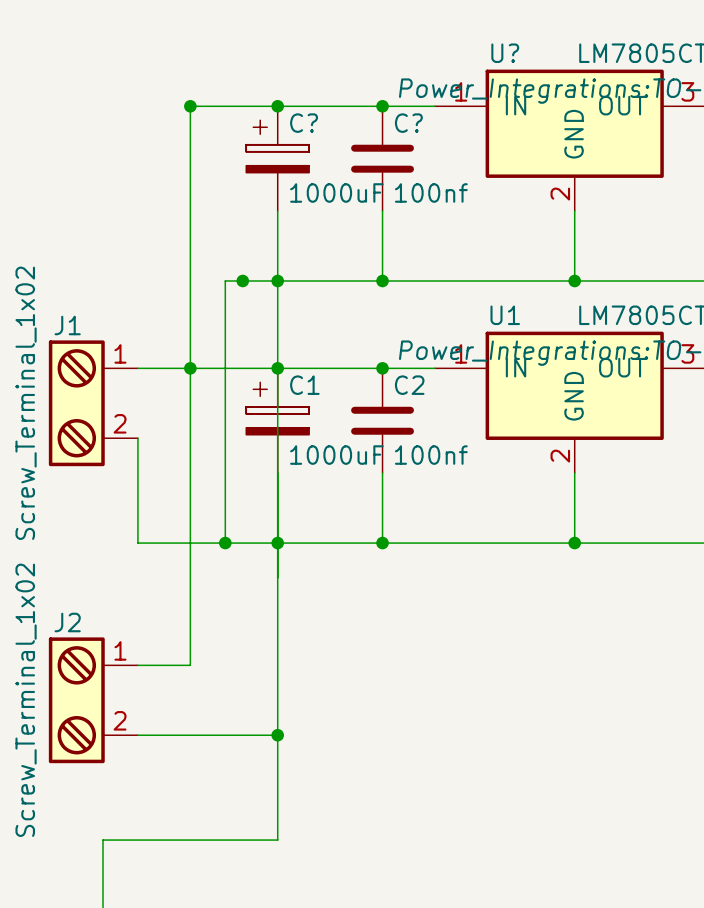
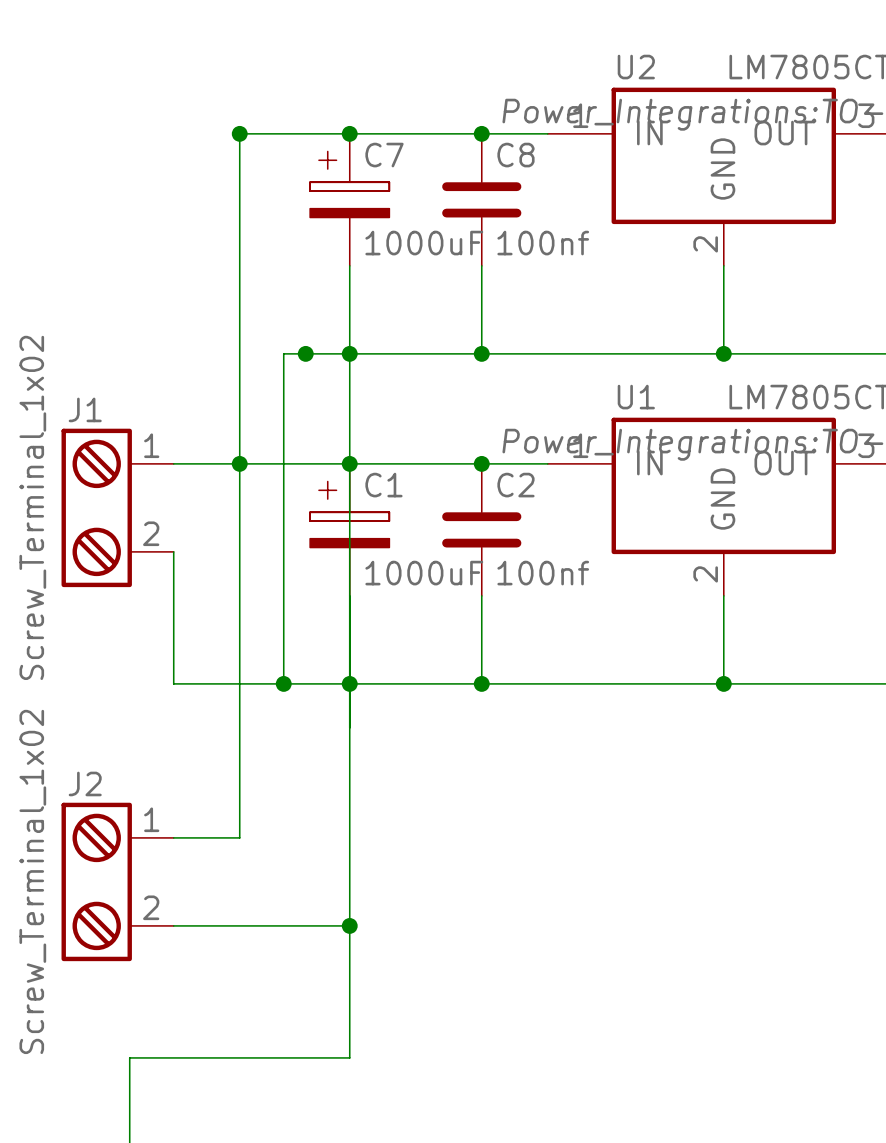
U? name: U? (505, 53) -> U2 (636, 67)
C? name: C? (304, 123) -> C7 (384, 155)
C? name: C? (408, 123) -> C8 (515, 155)

